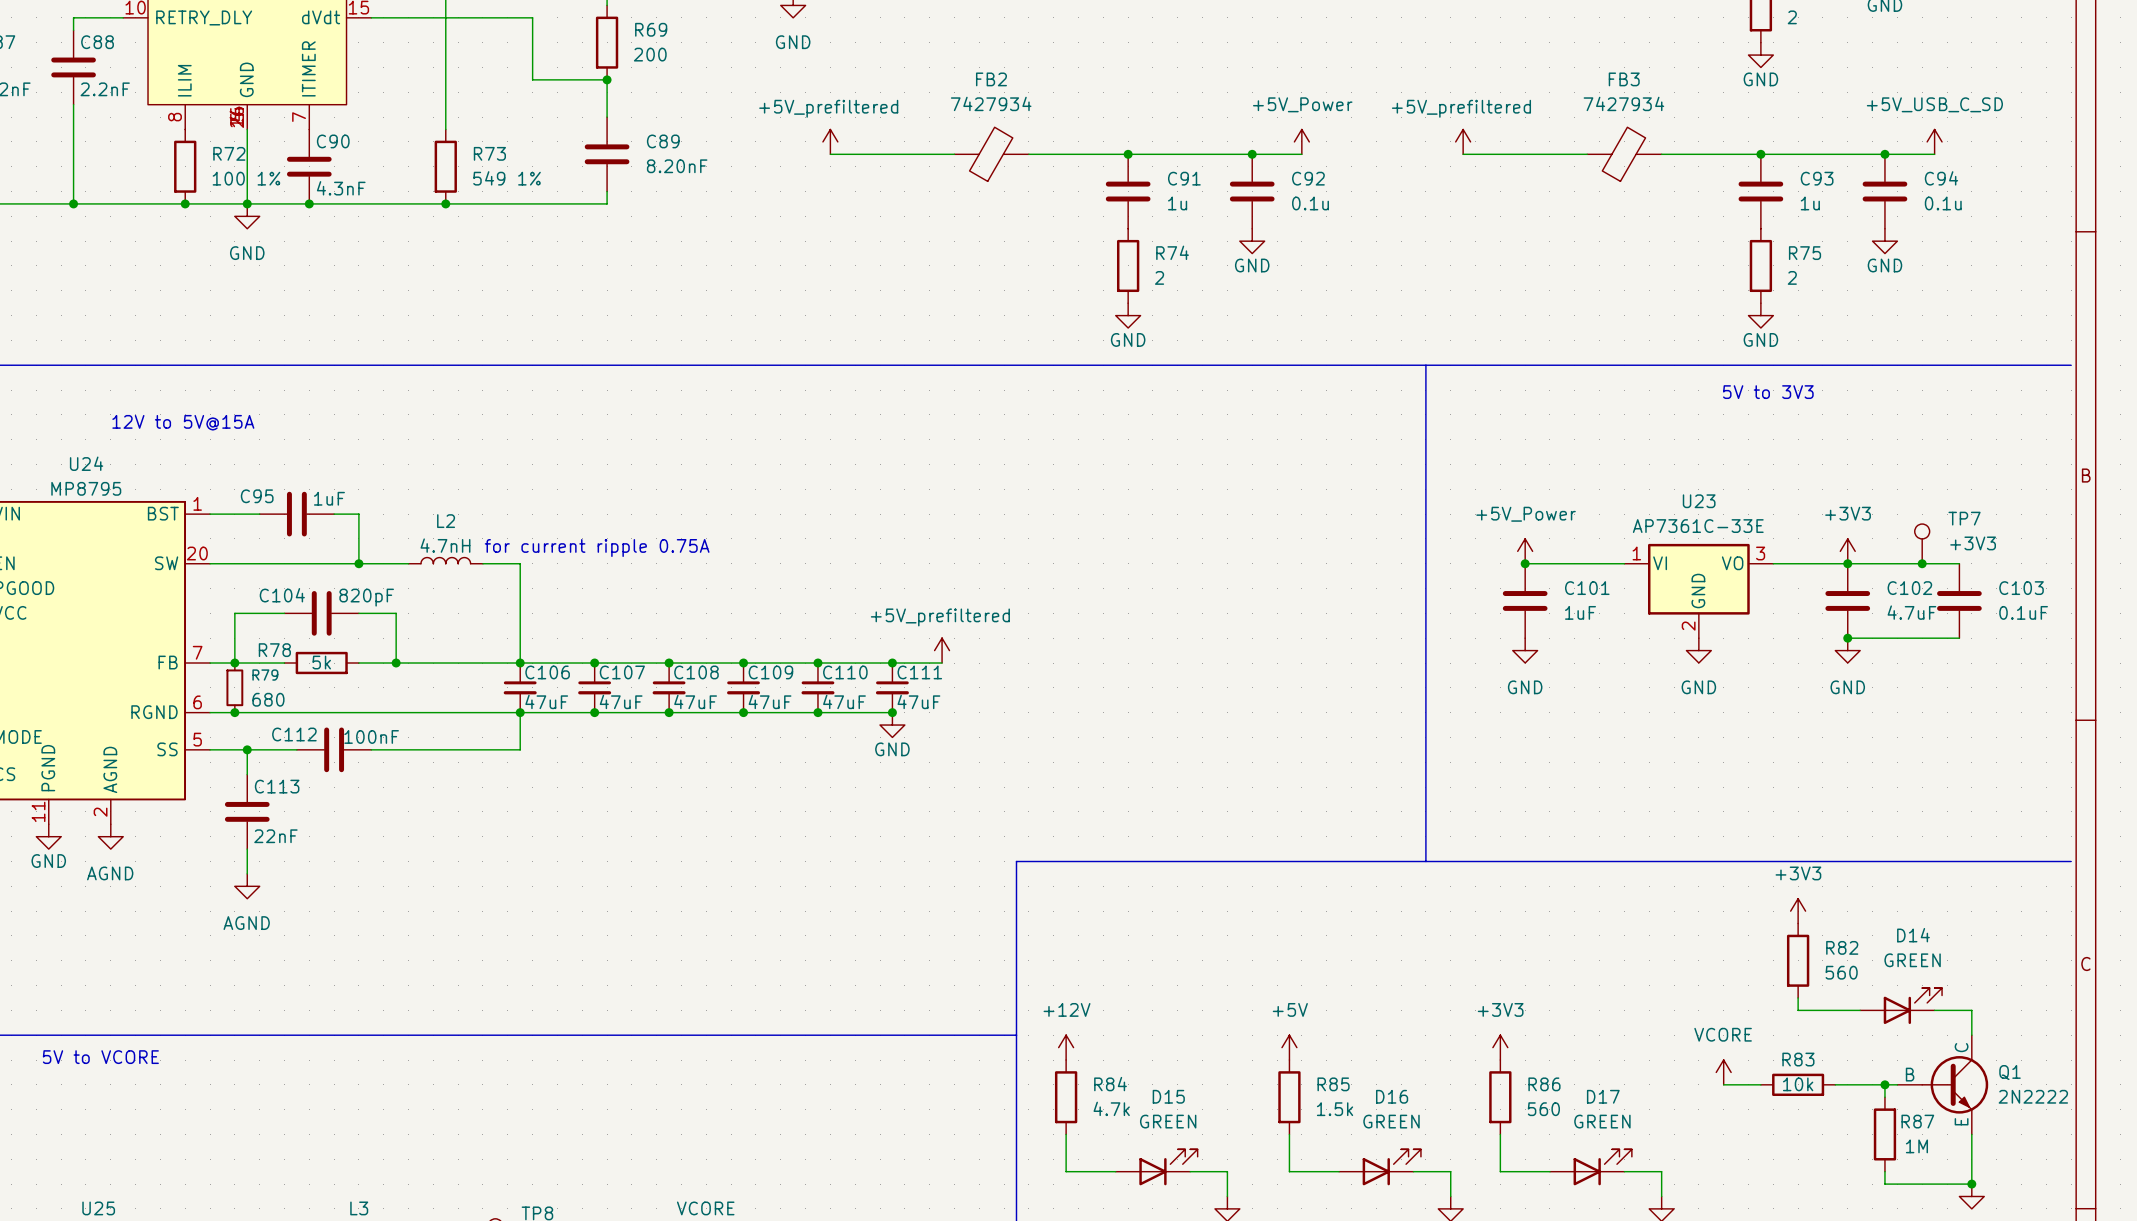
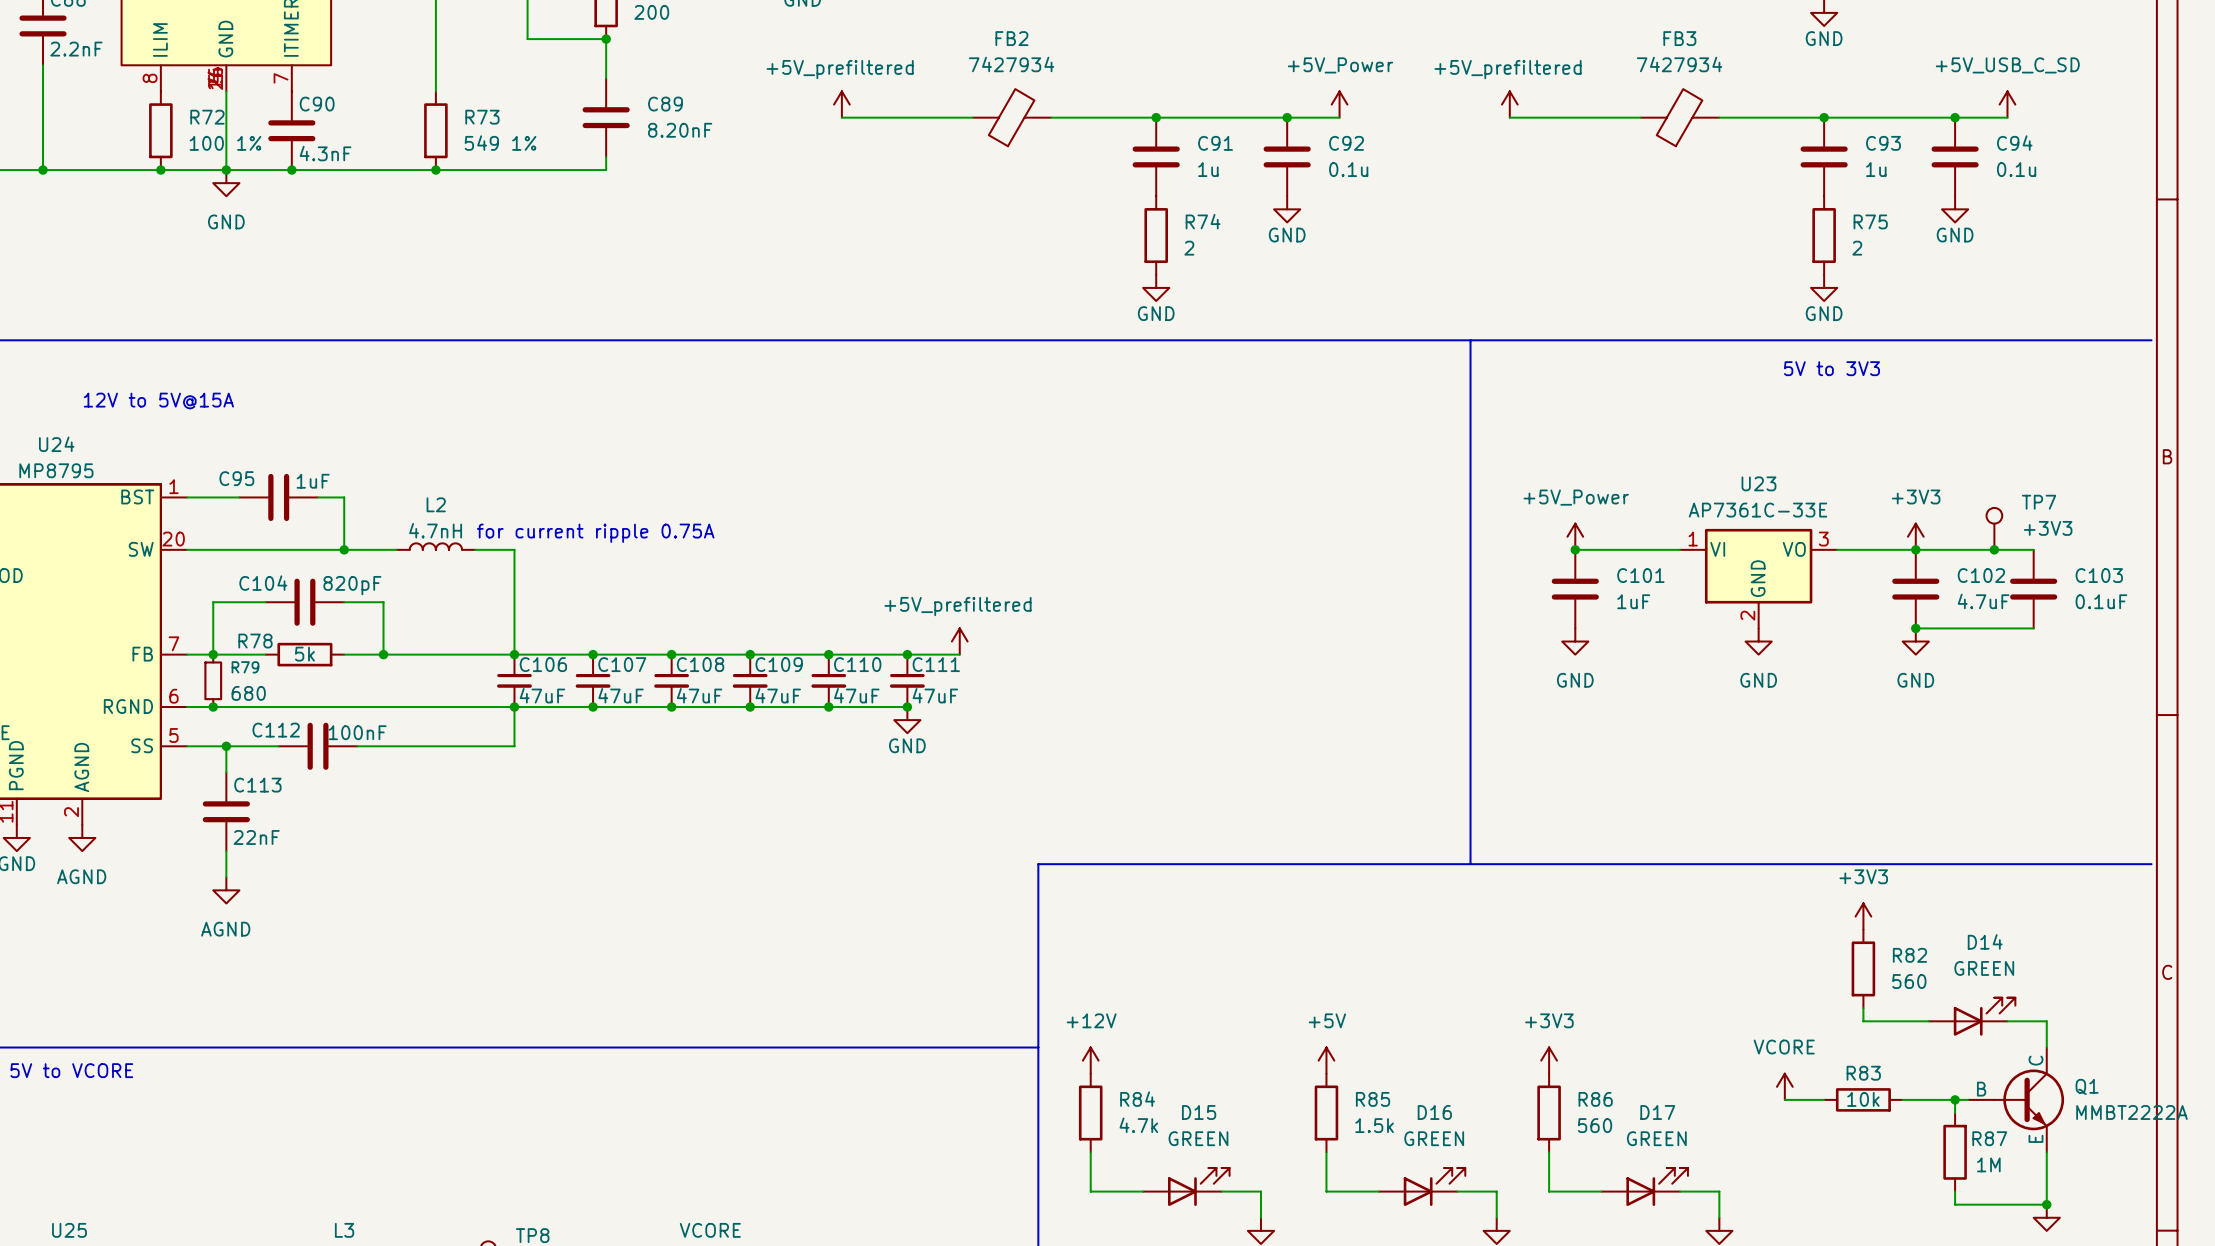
Q1 value: 2N2222 (2033, 1096) -> MMBT2222A (2131, 1112)

